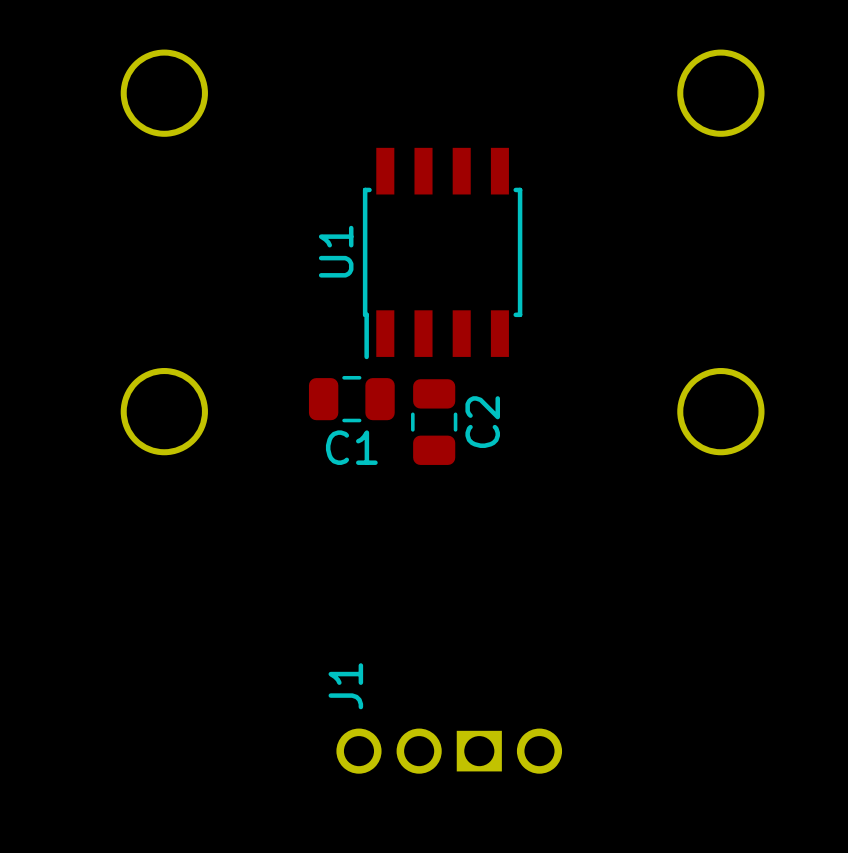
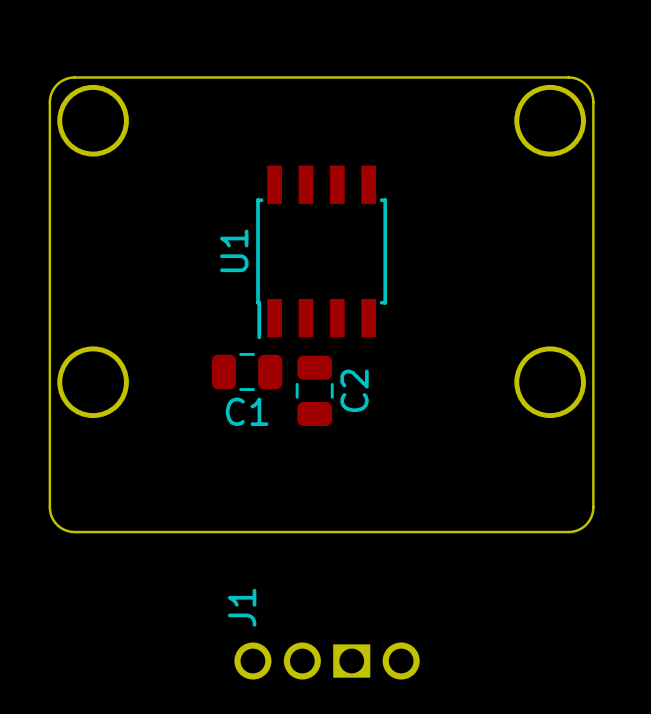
board edge: none -> (74, 77) (568, 77) (583, 82) (590, 89) (593, 102) (593, 507) (588, 522) (578, 530) (568, 532) (74, 532) (59, 526) (53, 519) (49, 507) (49, 102) (51, 92) (57, 84) (65, 79) (74, 77)

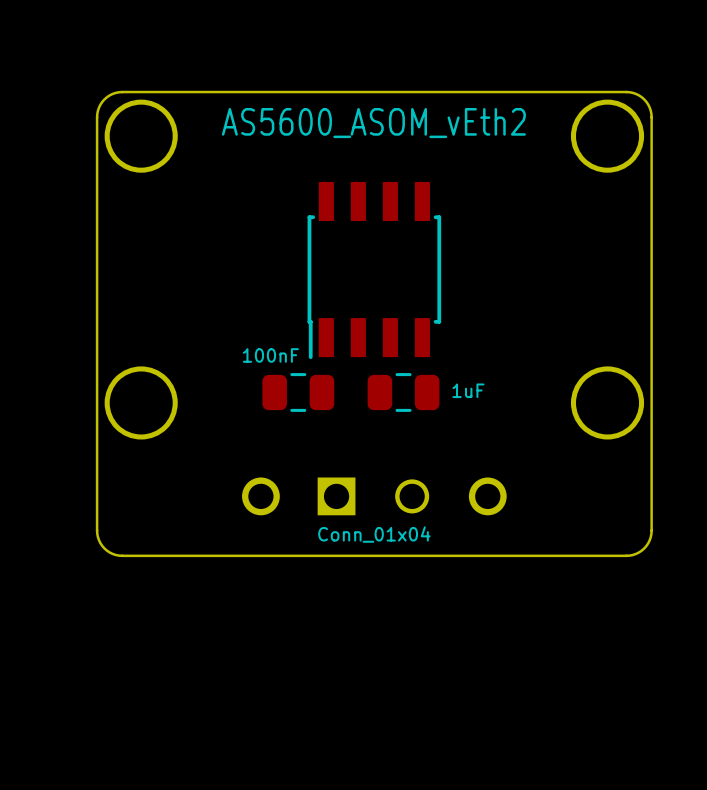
U1 value: none -> AS5600_ASOM_vEth2 (373, 123)
U1 name: U1 (234, 250) -> none
C1 value: none -> 100nF (270, 355)
part: none -> 1uF (403, 392)
C2: (314, 390) -> none
C1 name: C1 (247, 411) -> none
part: none -> Conn_01x04 (374, 496)
J1: (327, 661) -> none

